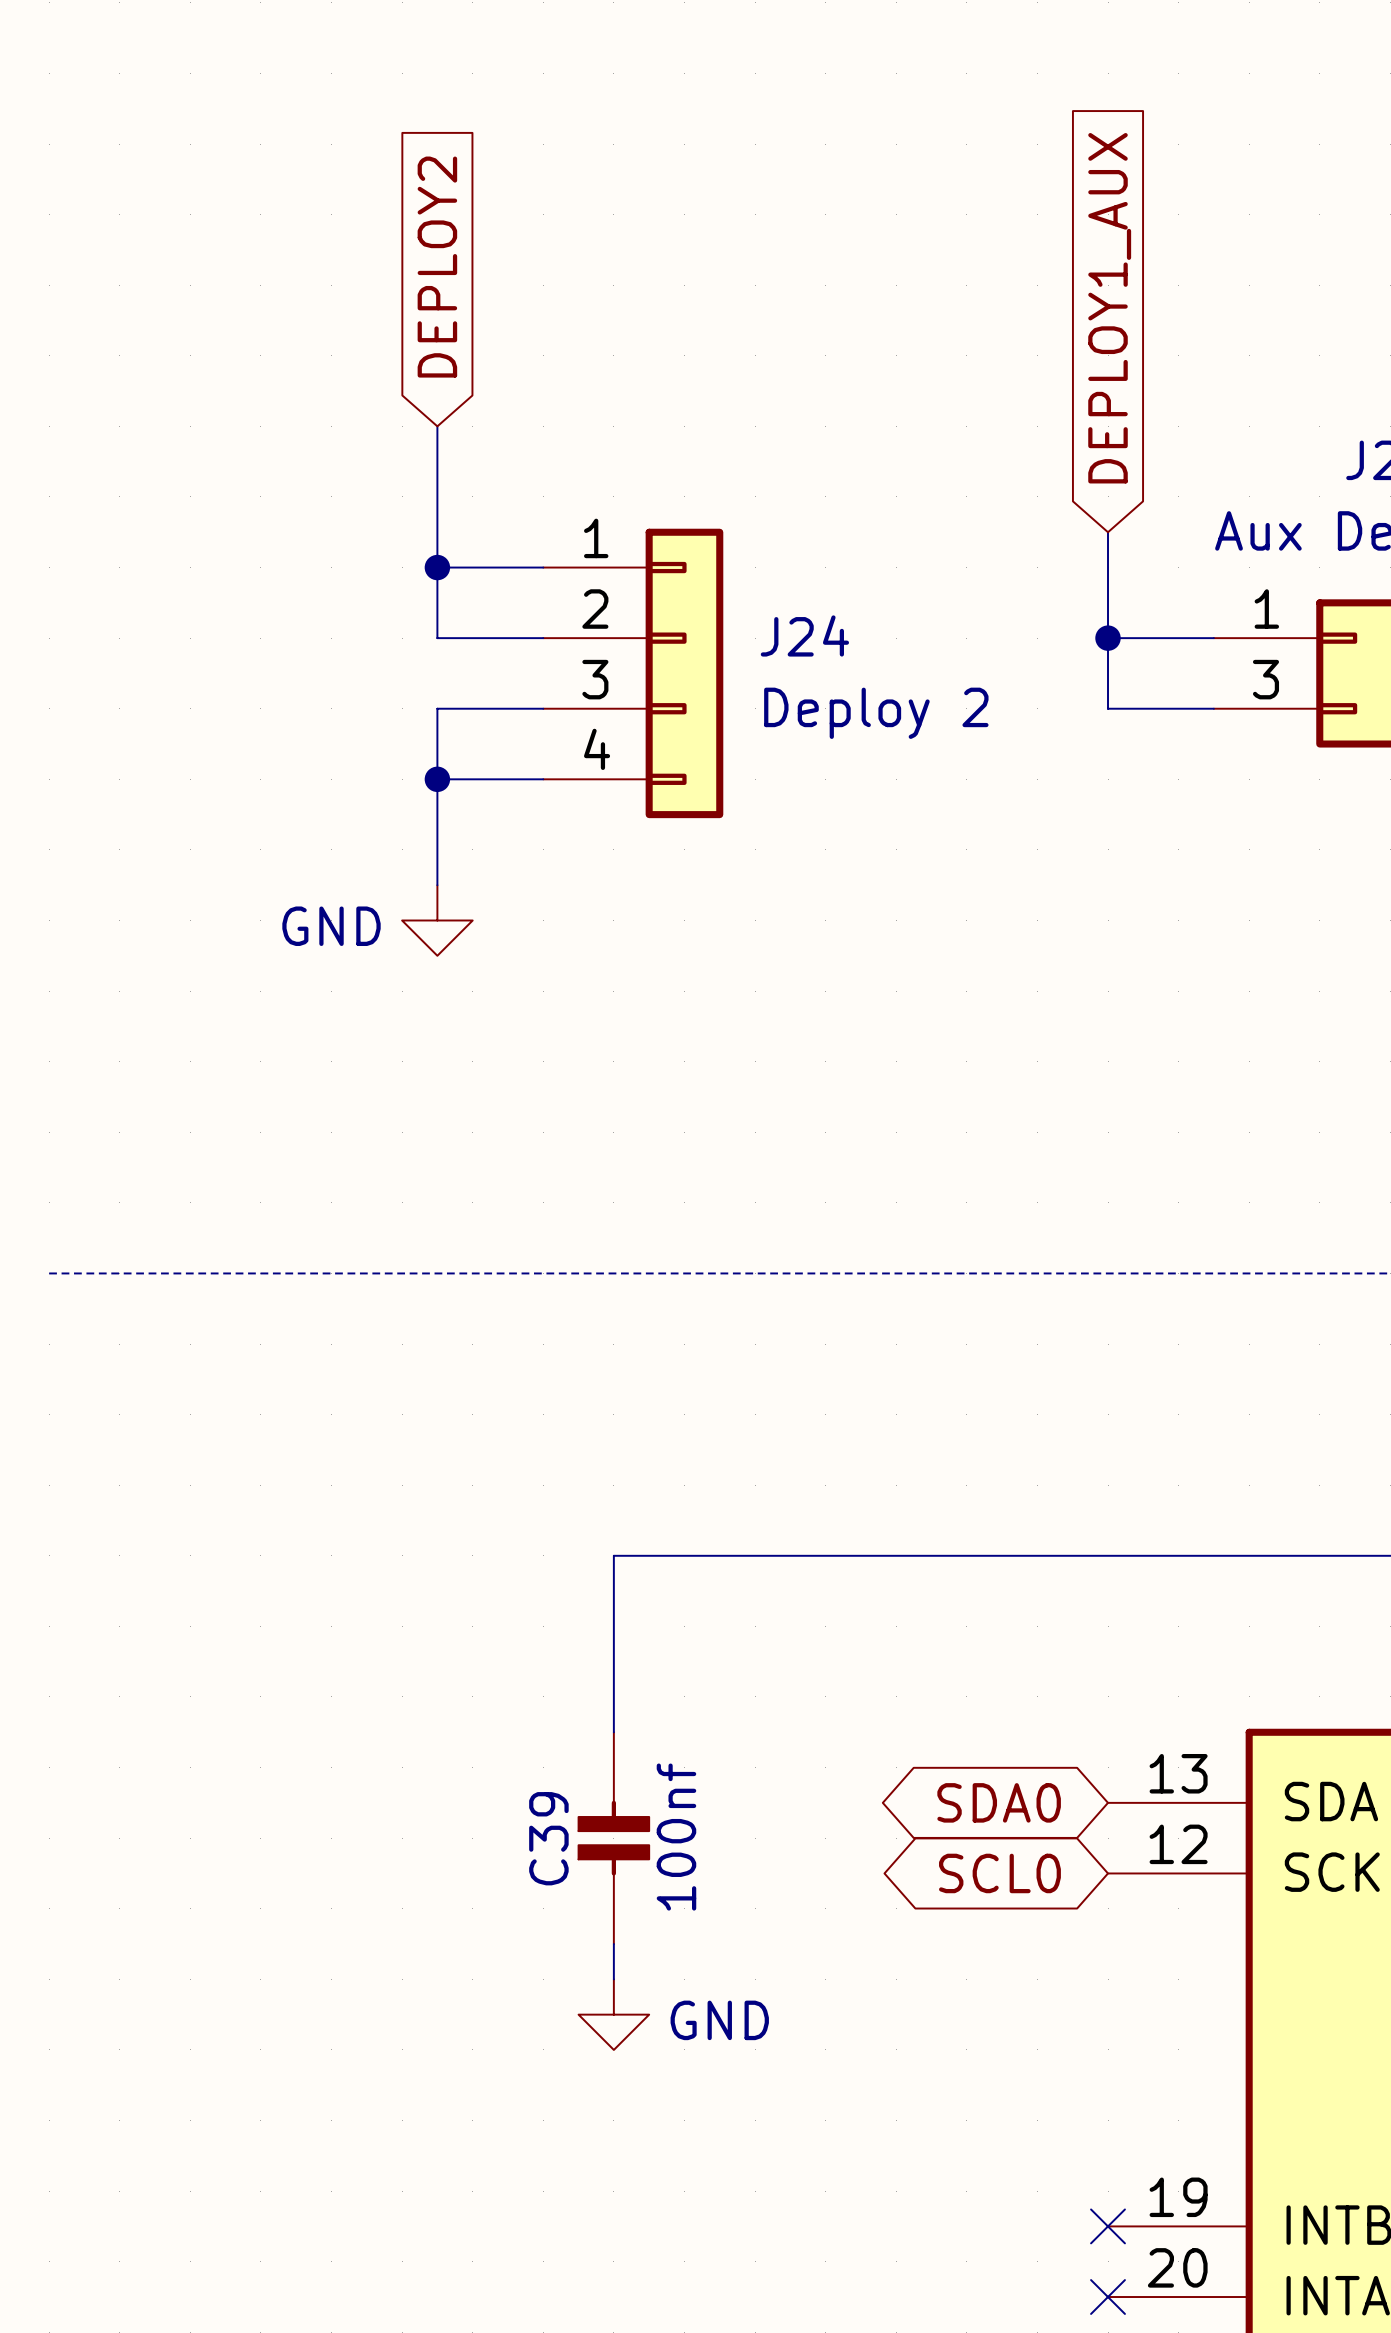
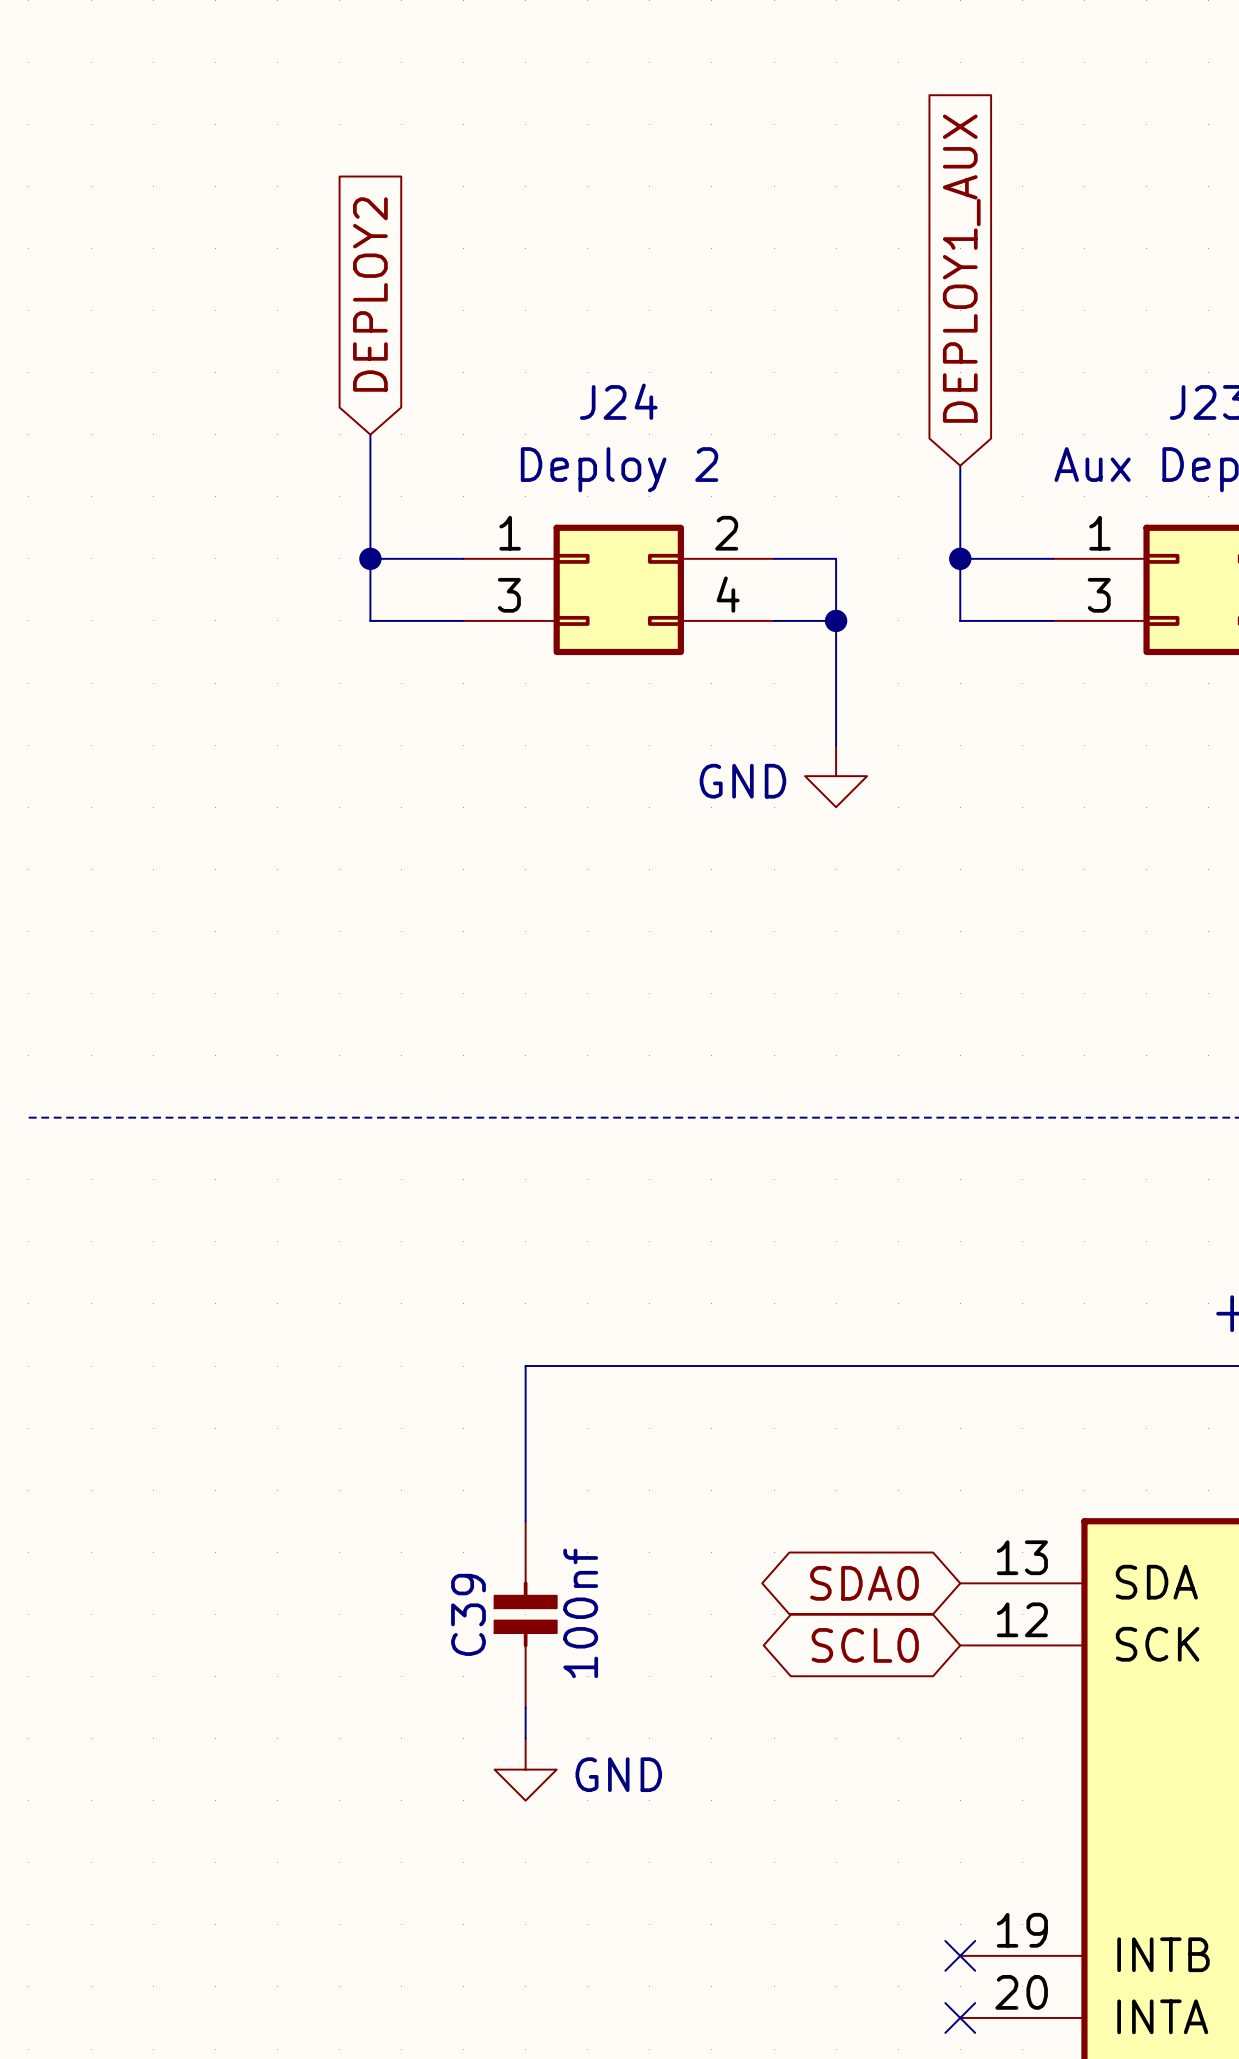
global label position: DEPLOY2 (437, 267) -> DEPLOY2 (370, 294)
wire: (437, 426) (437, 496) -> none
J24 symbol: [543, 528, 724, 819] -> [463, 524, 775, 656]
wire: (437, 567) (543, 567) -> none
junction: (437, 567) -> none
J24 name position: J24 (804, 635) -> J24 (618, 401)
junction: none -> (370, 558)
wire: none -> (774, 558) (836, 558) (836, 745)
wire: (437, 708) (437, 885) -> (370, 620) (370, 558)
wire: none -> (774, 620) (836, 620)
junction: none -> (836, 620)
J24 value position: Deploy 2 (876, 713) -> Deploy 2 (619, 469)
wire: (437, 779) (543, 779) -> none
junction: (437, 779) -> none
power symbol position: GND (437, 920) -> GND (836, 776)

